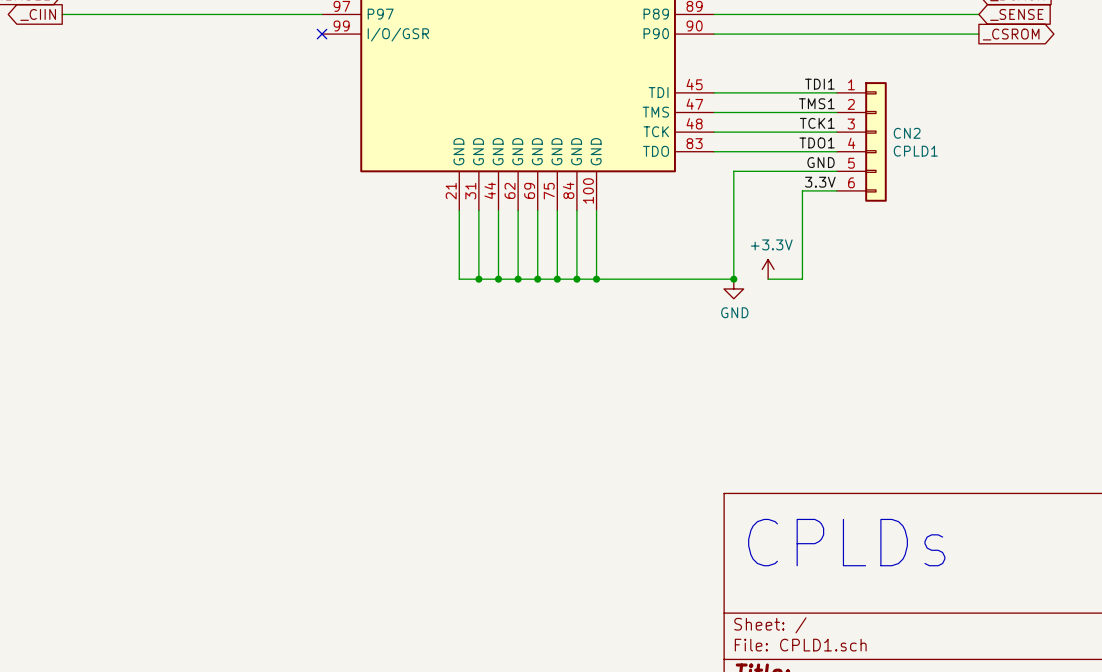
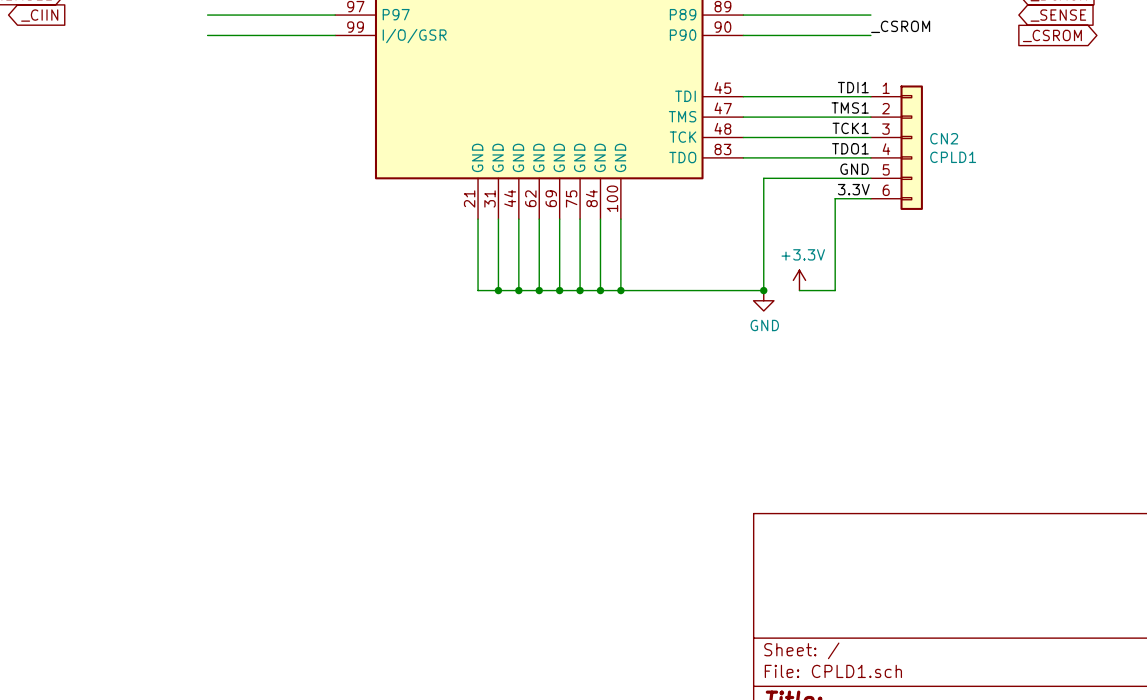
wire: (62, 14) (199, 14) -> none
wire: (836, 14) (978, 14) -> none
label: none -> _CSROM (900, 26)
wire: none -> (207, 35) (335, 35)
no-connect mark: (322, 34) -> none
wire: (836, 34) (978, 34) -> none
text: CPLDs (846, 542) -> none

